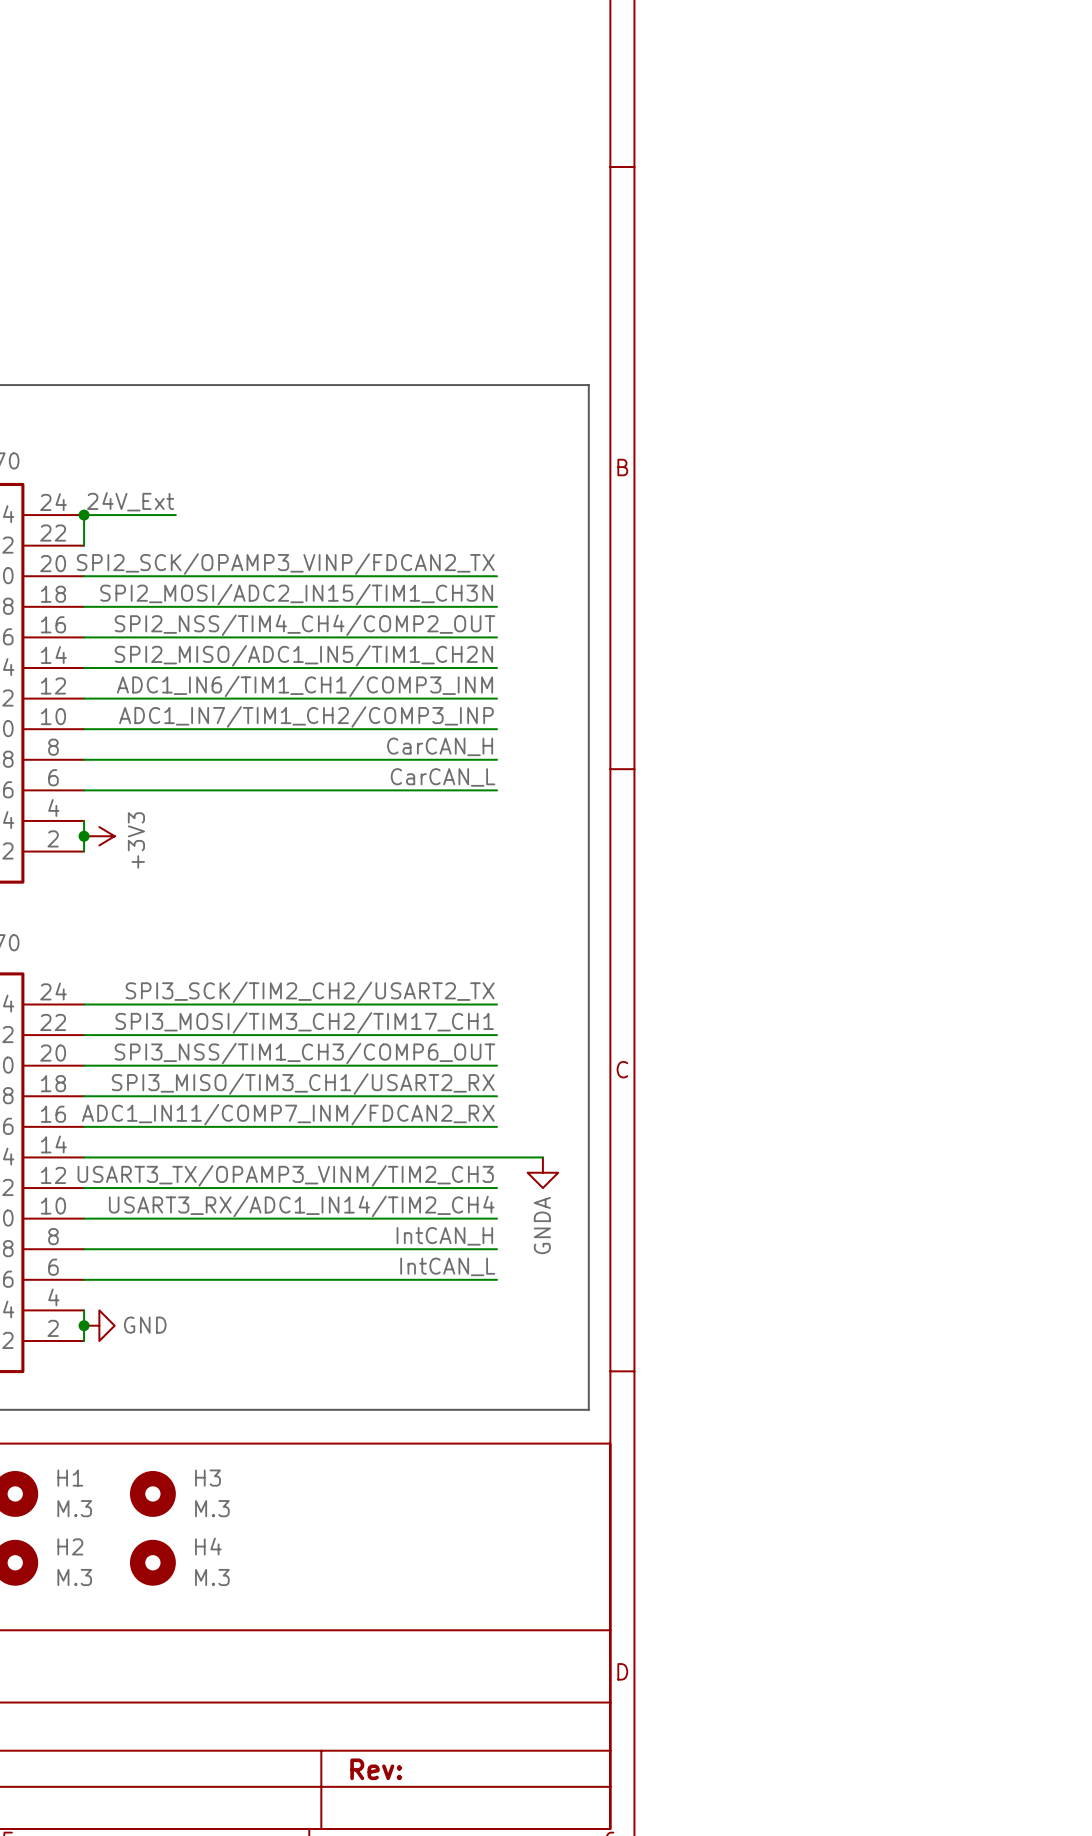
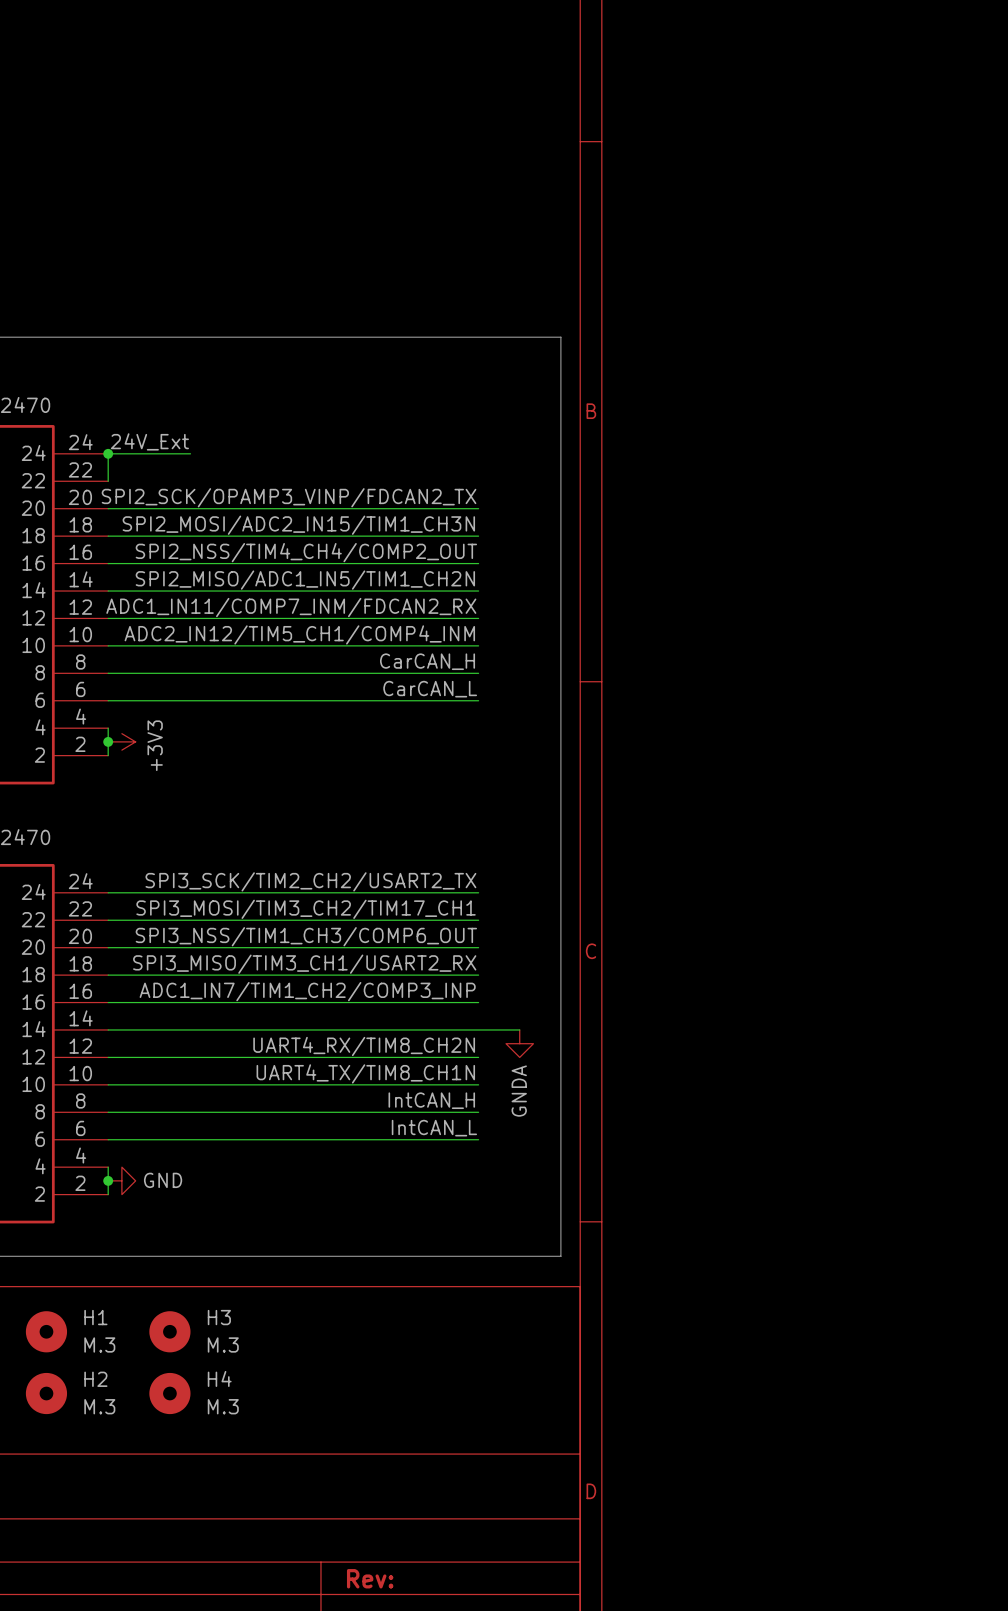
label: ADC1_IN6/TIM1_CH1/COMP3_INM (305, 686) -> ADC1_IN11/COMP7_INM/FDCAN2_RX (291, 607)
label: ADC1_IN7/TIM1_CH2/COMP3_INP (306, 717) -> ADC2_IN12/TIM5_CH1/COMP4_INM (299, 634)
label: ADC1_IN11/COMP7_INM/FDCAN2_RX (288, 1114) -> ADC1_IN7/TIM1_CH2/COMP3_INP (307, 991)
label: USART3_TX/OPAMP3_VINM/TIM2_CH3 (285, 1175) -> UART4_RX/TIM8_CH2N (364, 1046)
label: USART3_RX/ADC1_IN14/TIM2_CH4 (301, 1206) -> UART4_TX/TIM8_CH1N (365, 1073)

